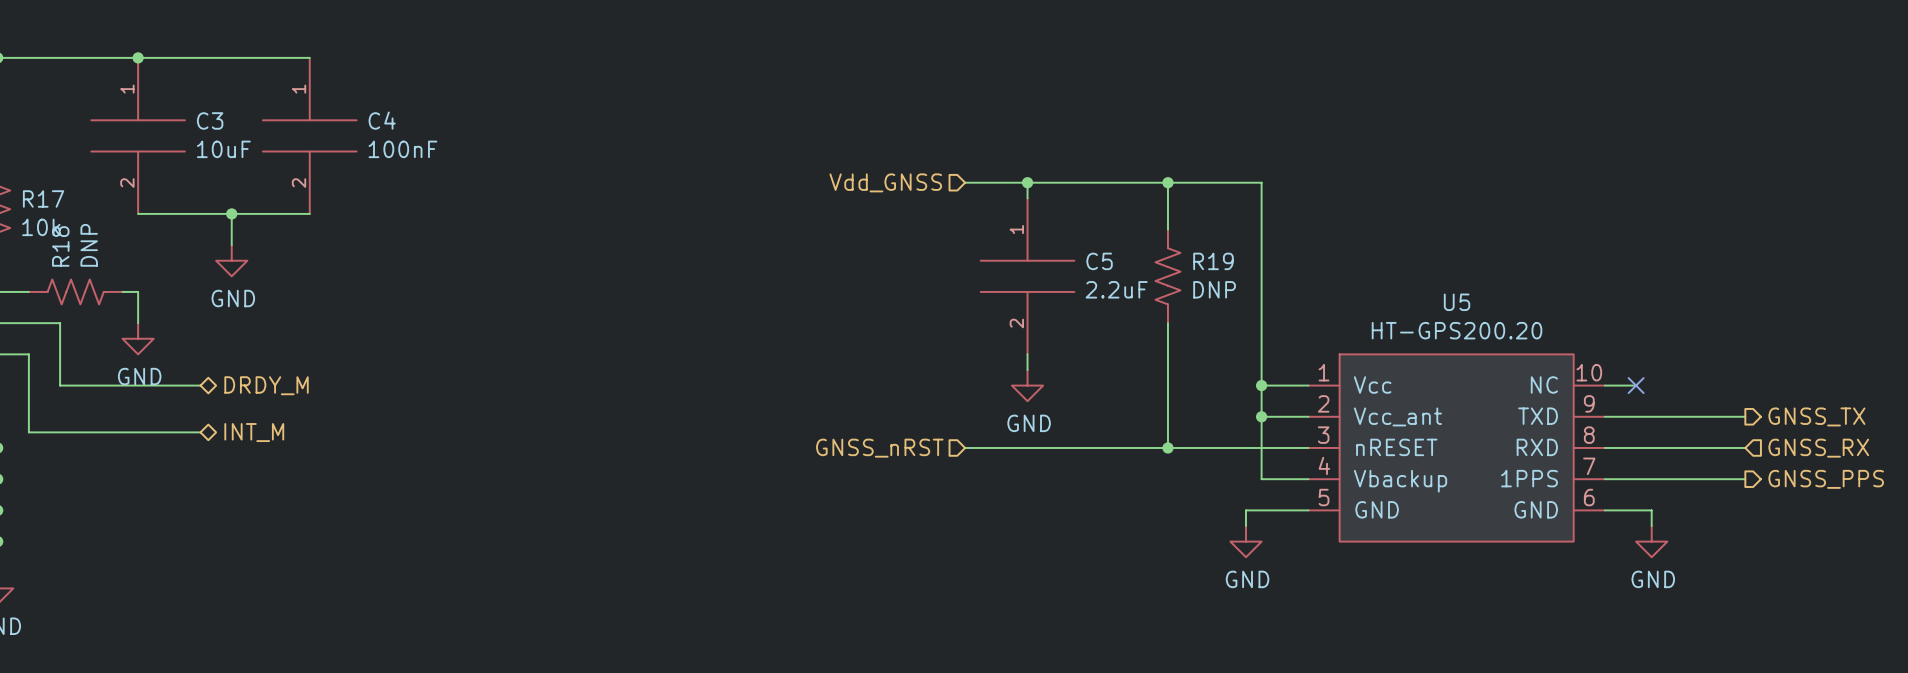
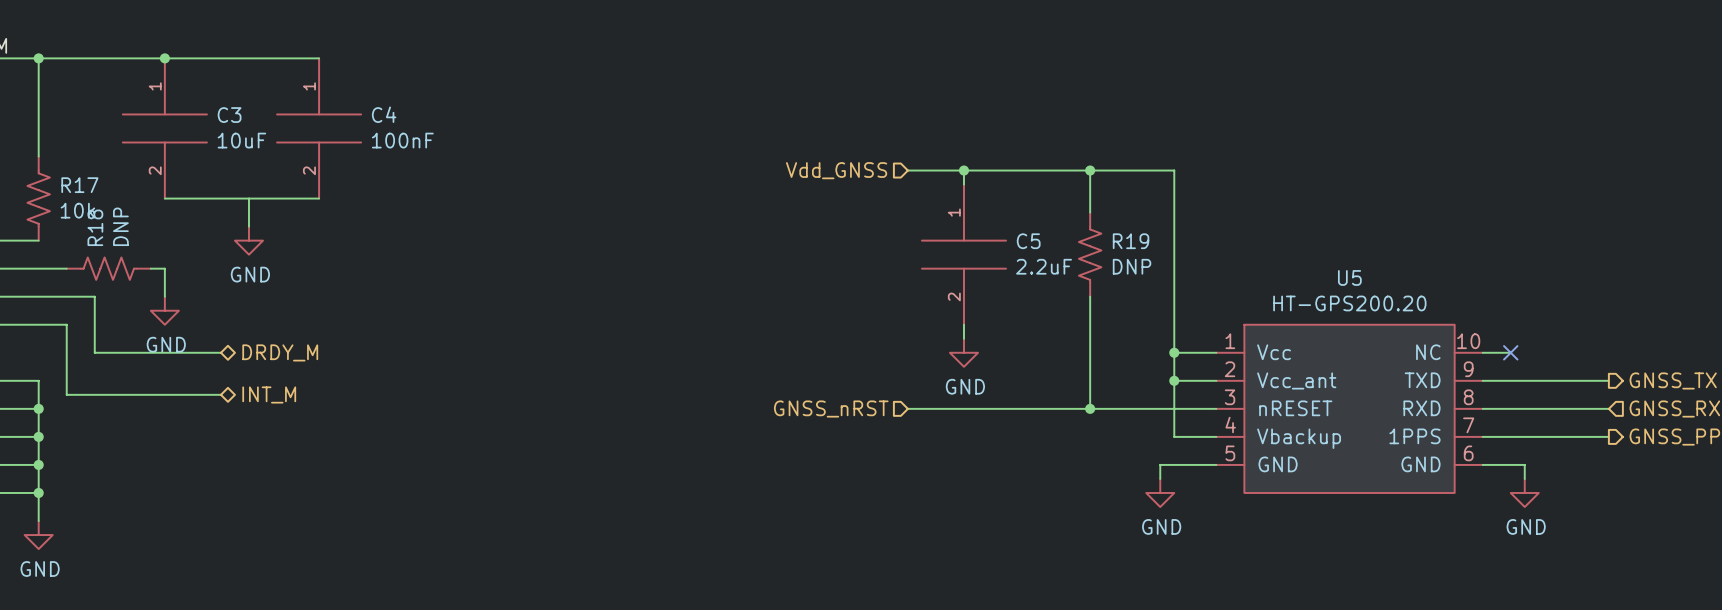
junction: (231, 213) -> none

